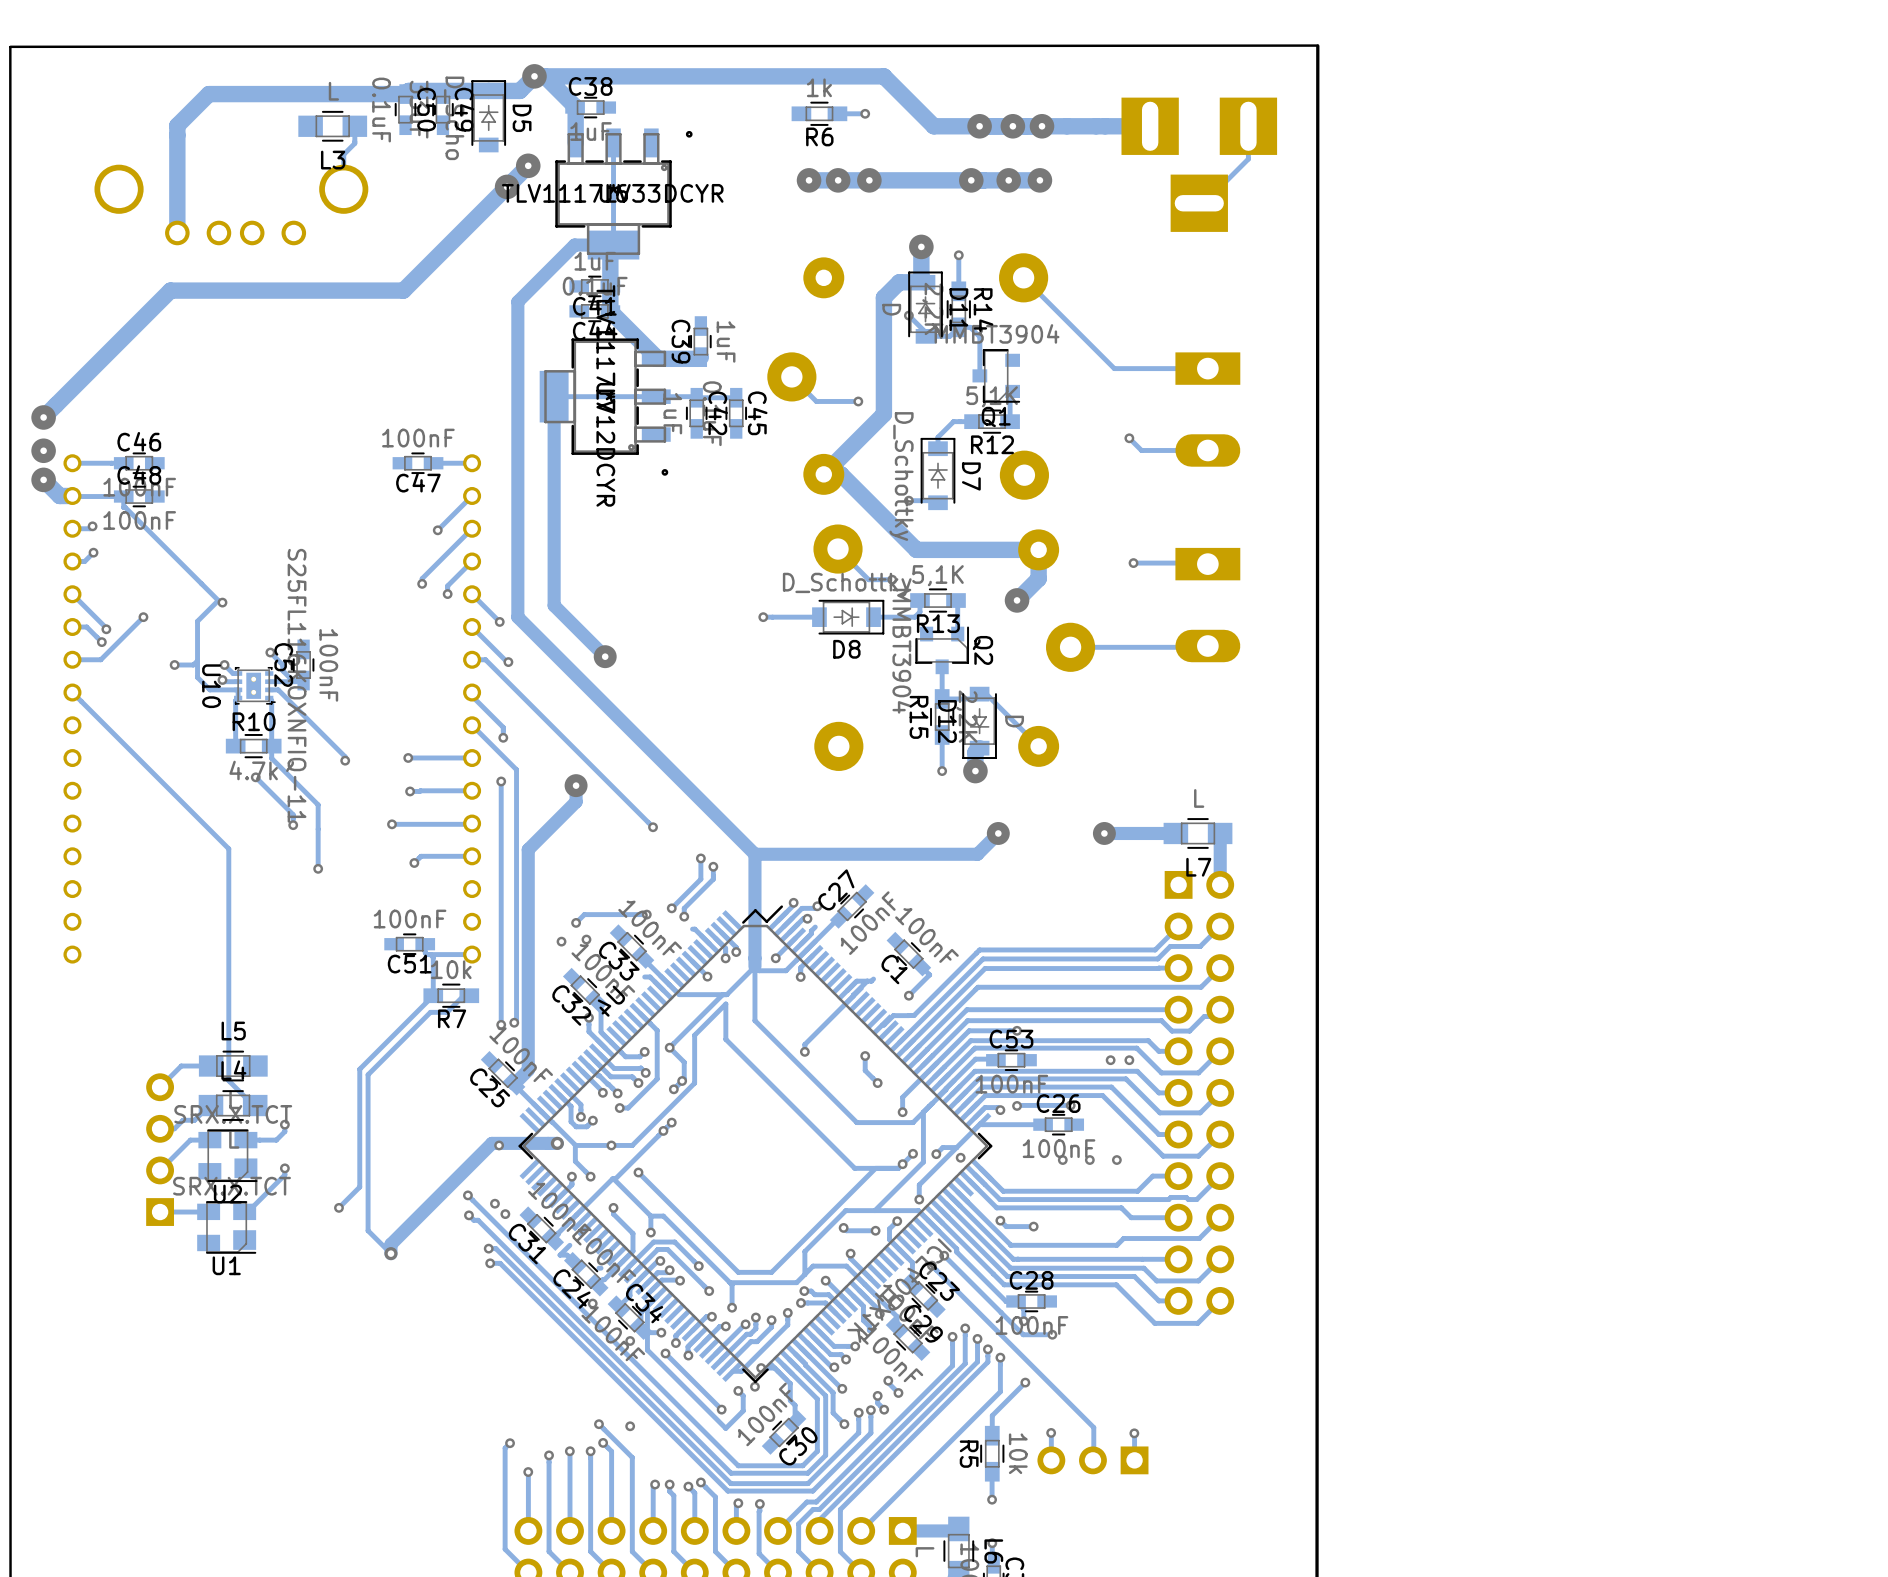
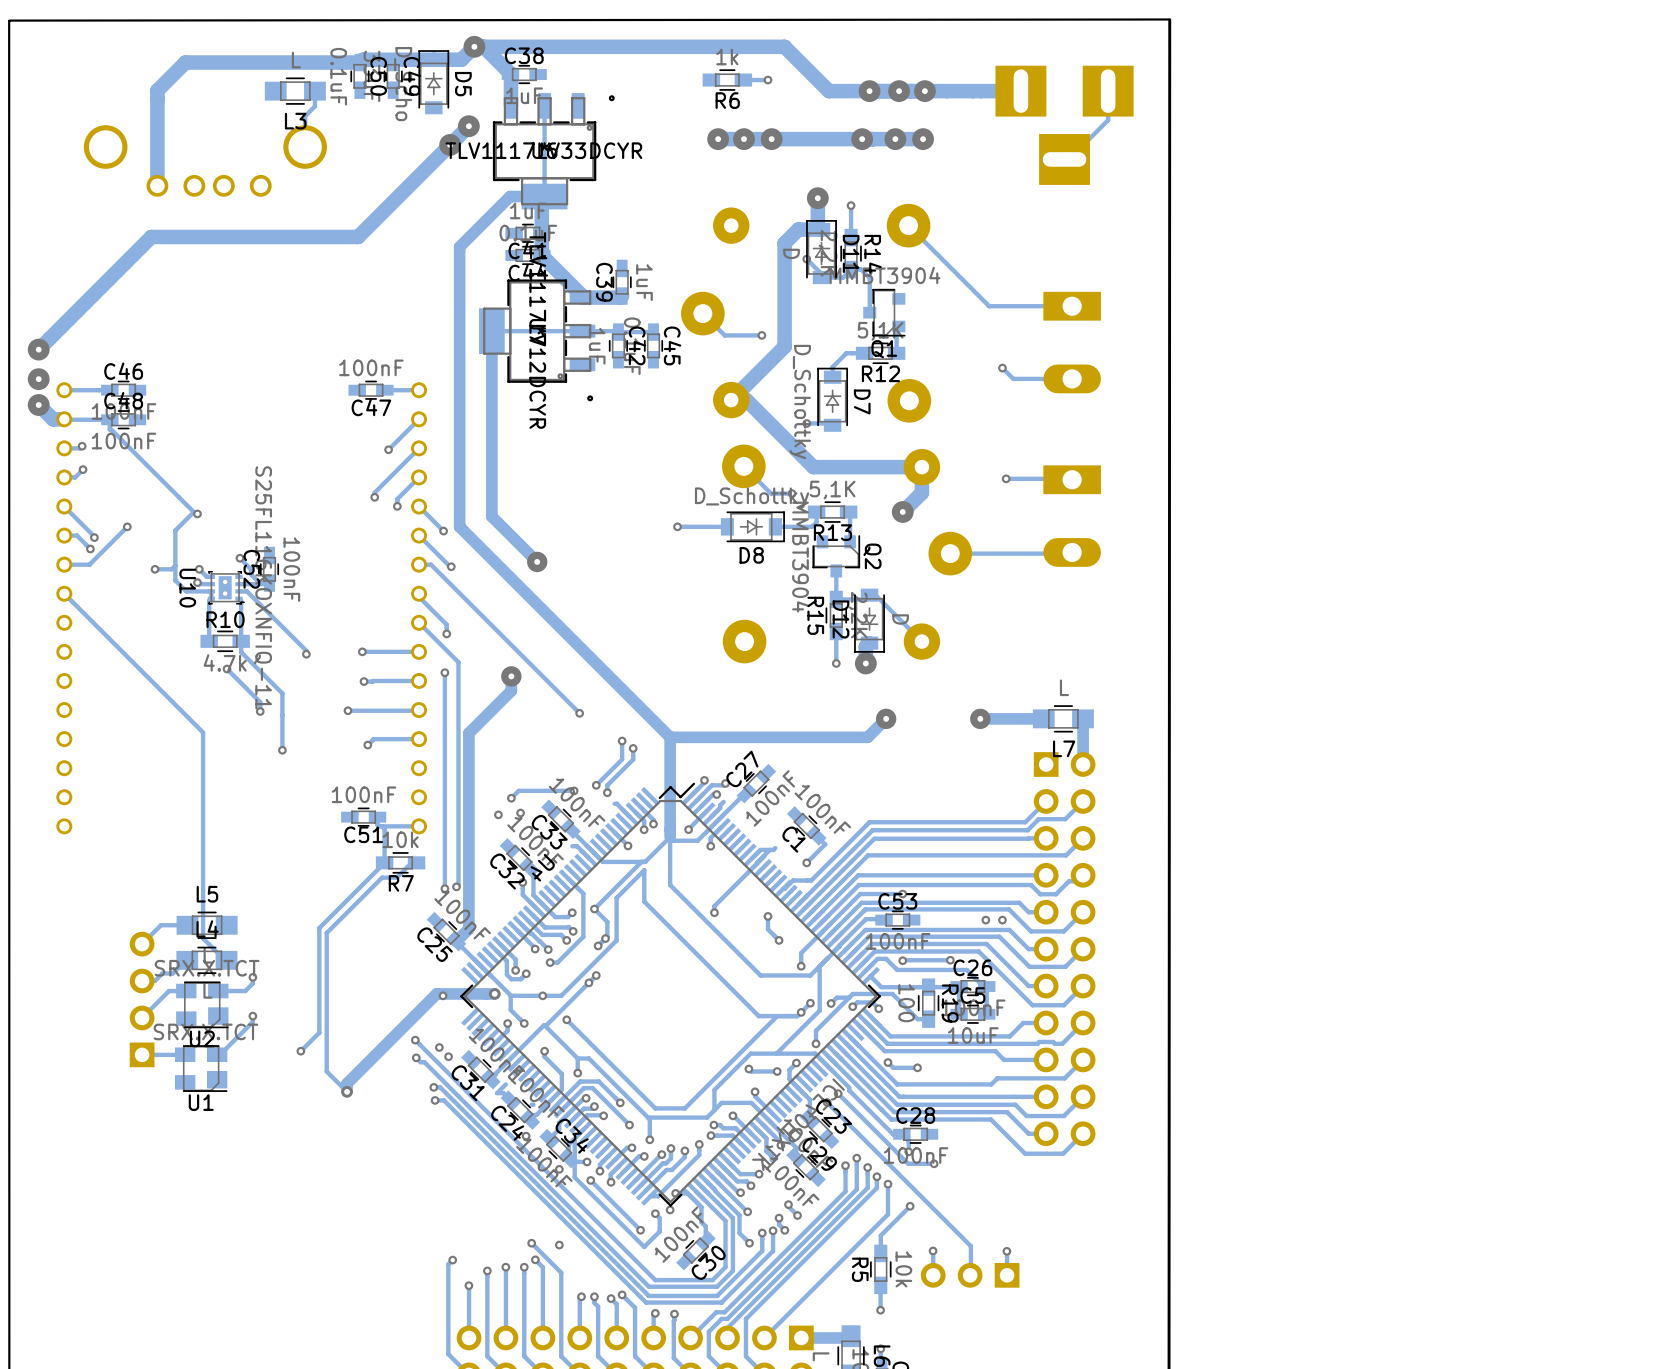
track: (985, 1107) (997, 1107) (1000, 1110) -> (874, 962) (877, 958) (886, 958) (897, 969) (966, 969) (983, 986) (986, 986) (986, 1014)
via: (1000, 1110) -> none
track: (980, 1123) (960, 1143) -> (928, 1019) (917, 1019) (892, 993) (852, 993)
track: (1043, 1124) (981, 1124) -> (959, 1014) (959, 986) (881, 987) (871, 977)
C26 position: (1058, 1124) -> (972, 986)
R19: none -> 100 (928, 1003)
track: none -> (852, 1006) (857, 1002) (872, 1002) (878, 1008)
via: none -> (878, 1008)
via: (1062, 1160) -> none
via: (1089, 1160) -> none
via: (1116, 1160) -> none
C5: none -> 10uF (972, 1014)

